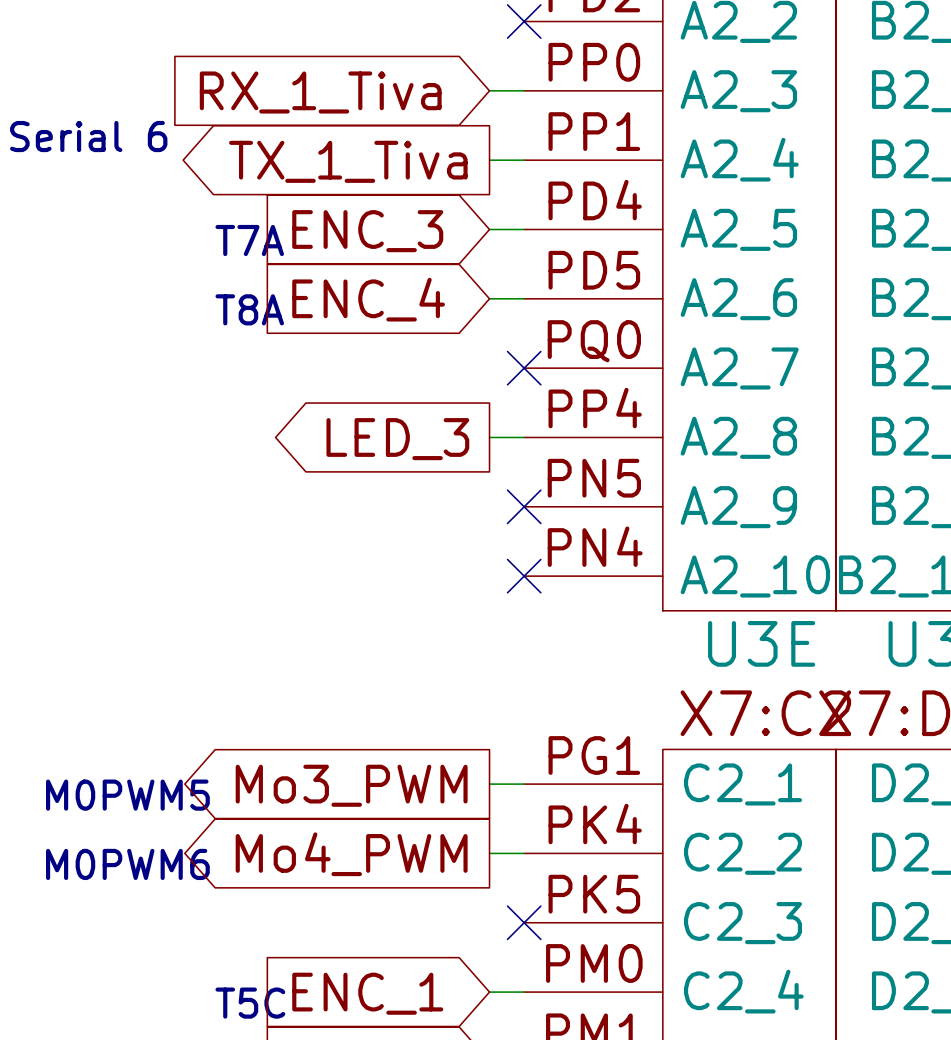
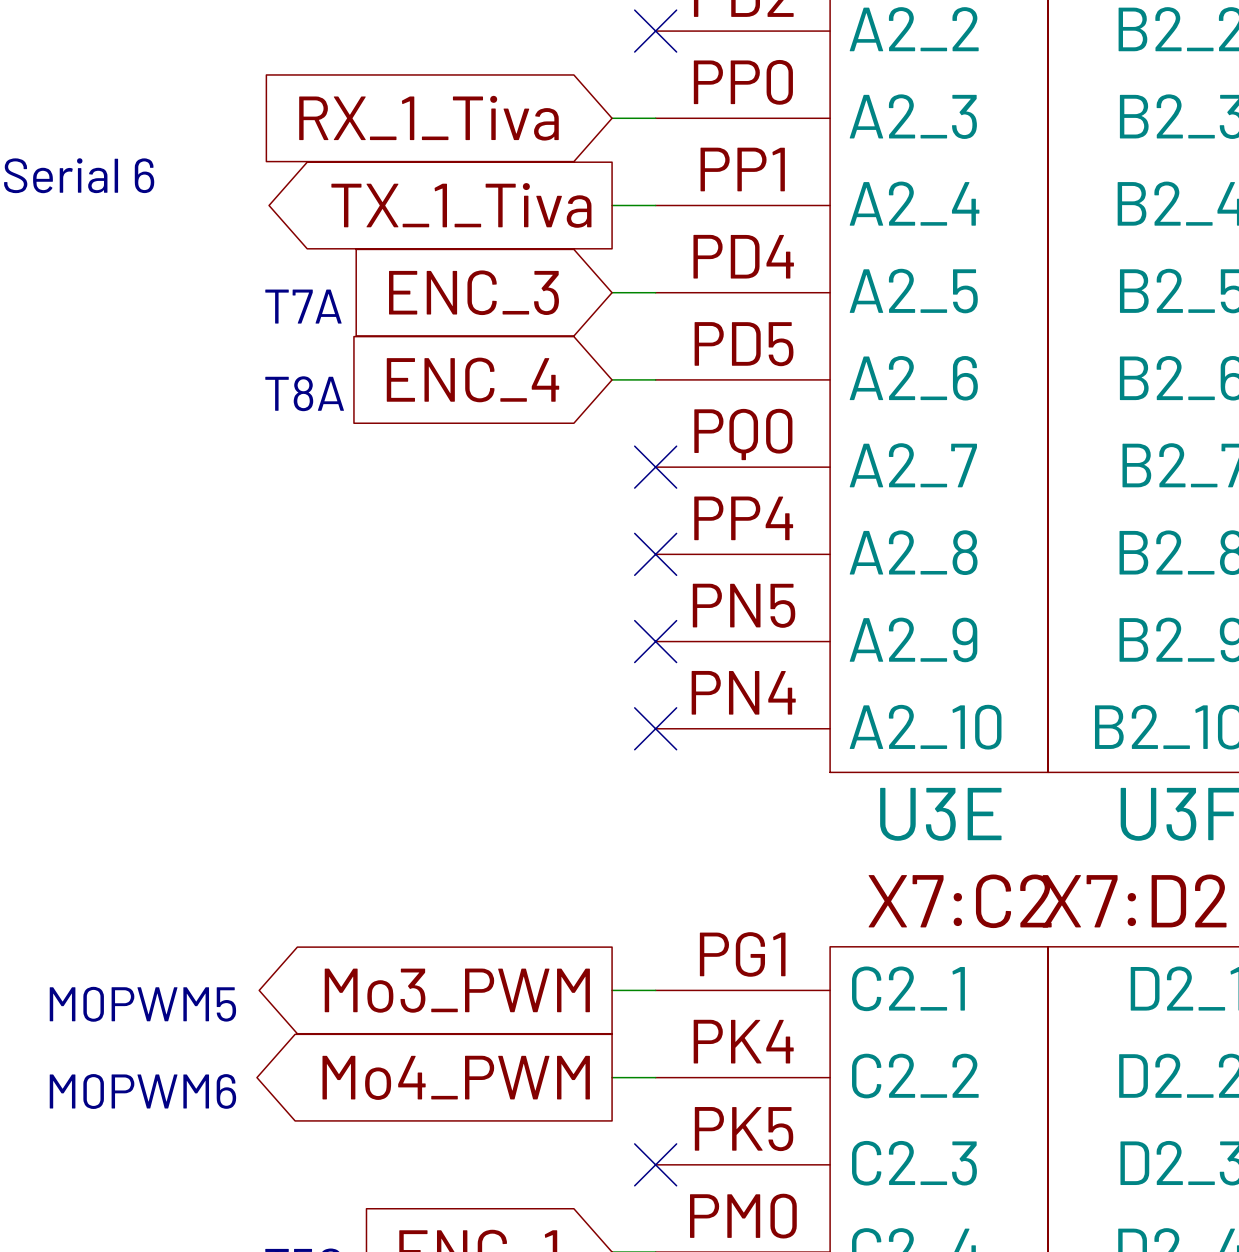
wire: (489, 437) (524, 437) -> none
no-connect mark: none -> (655, 554)
global label: LED_3 (397, 439) -> none

